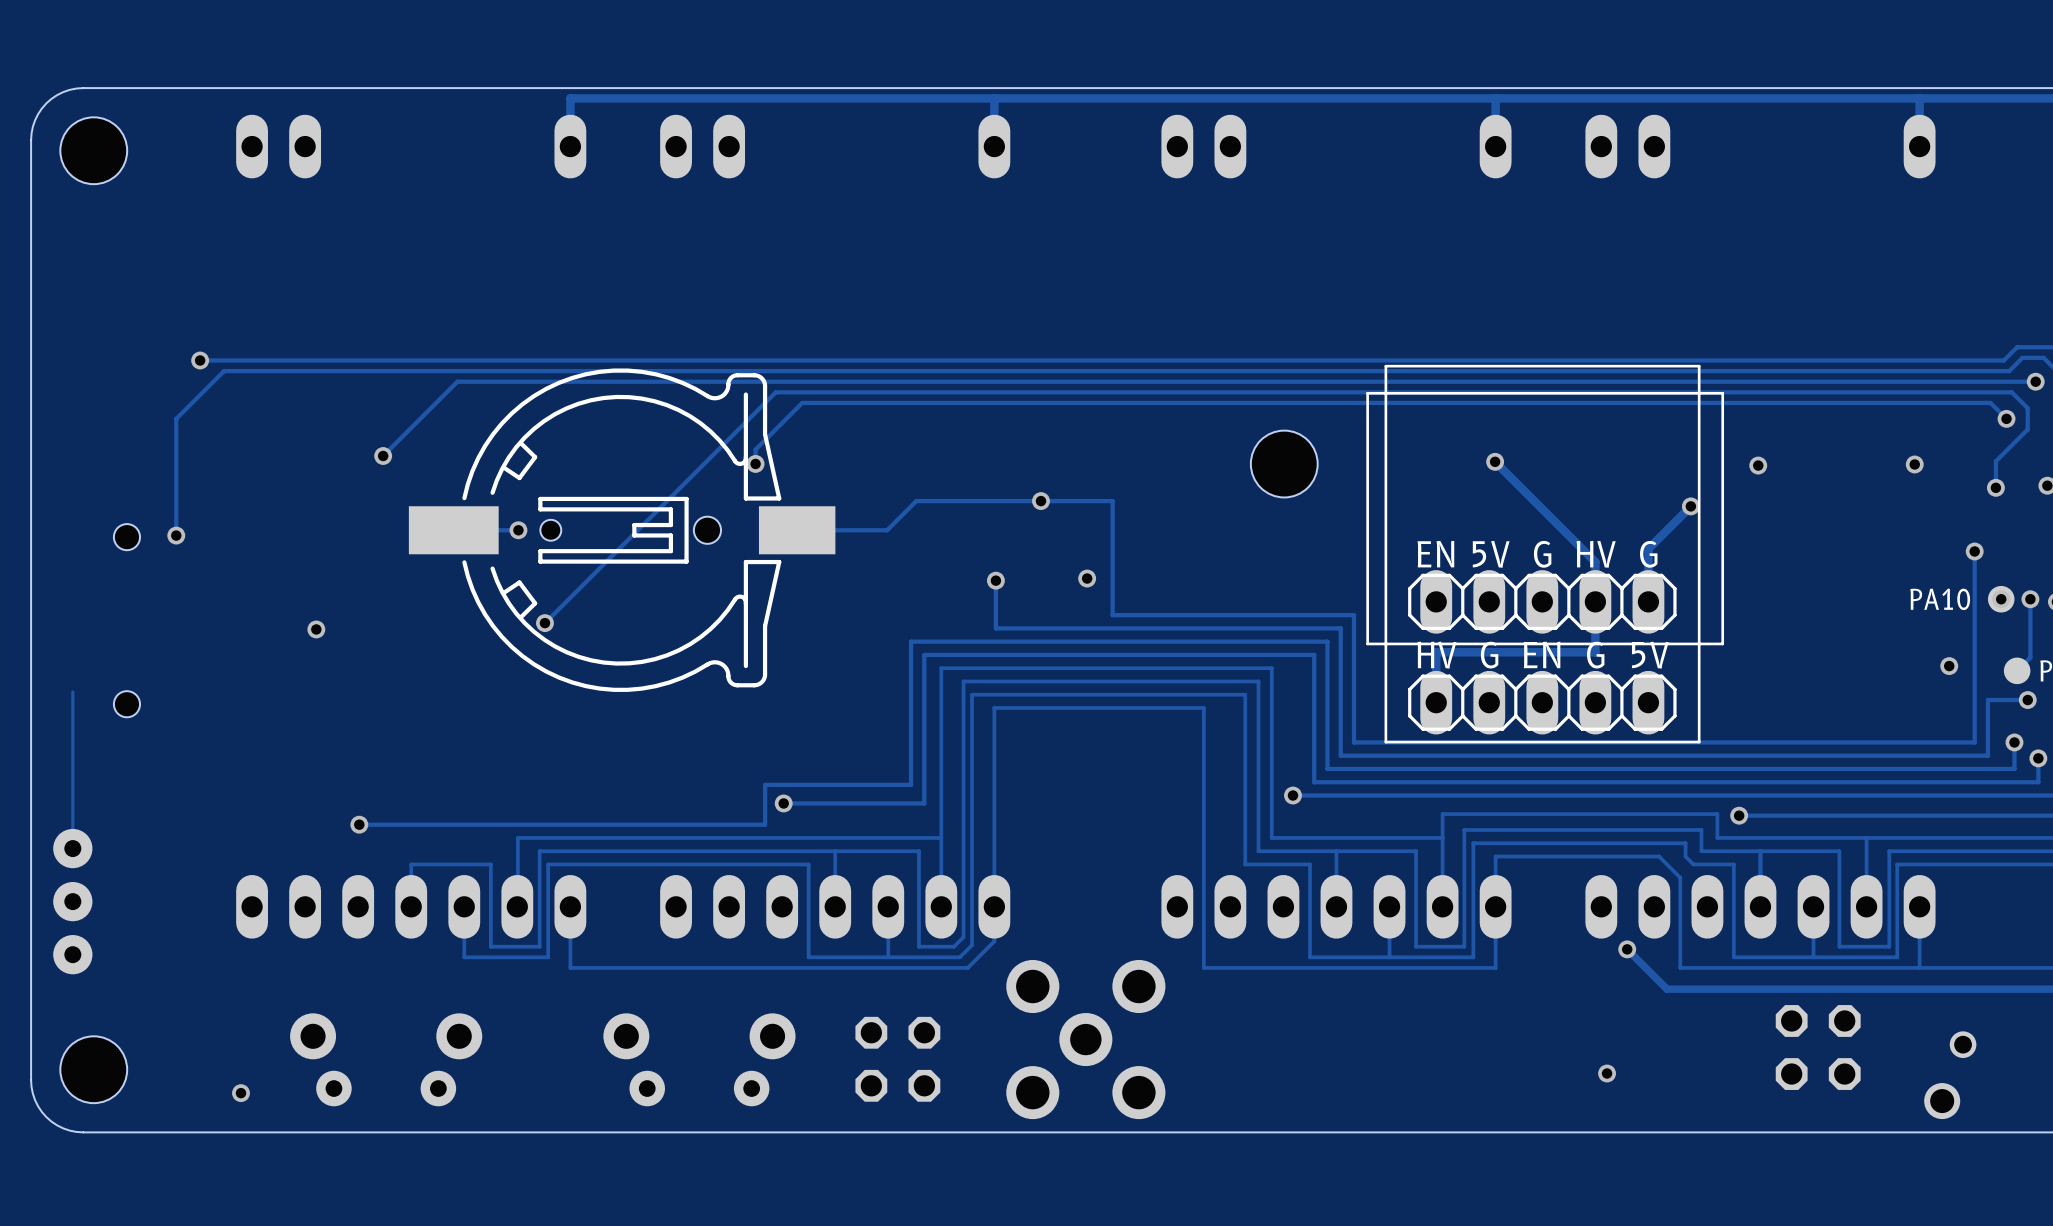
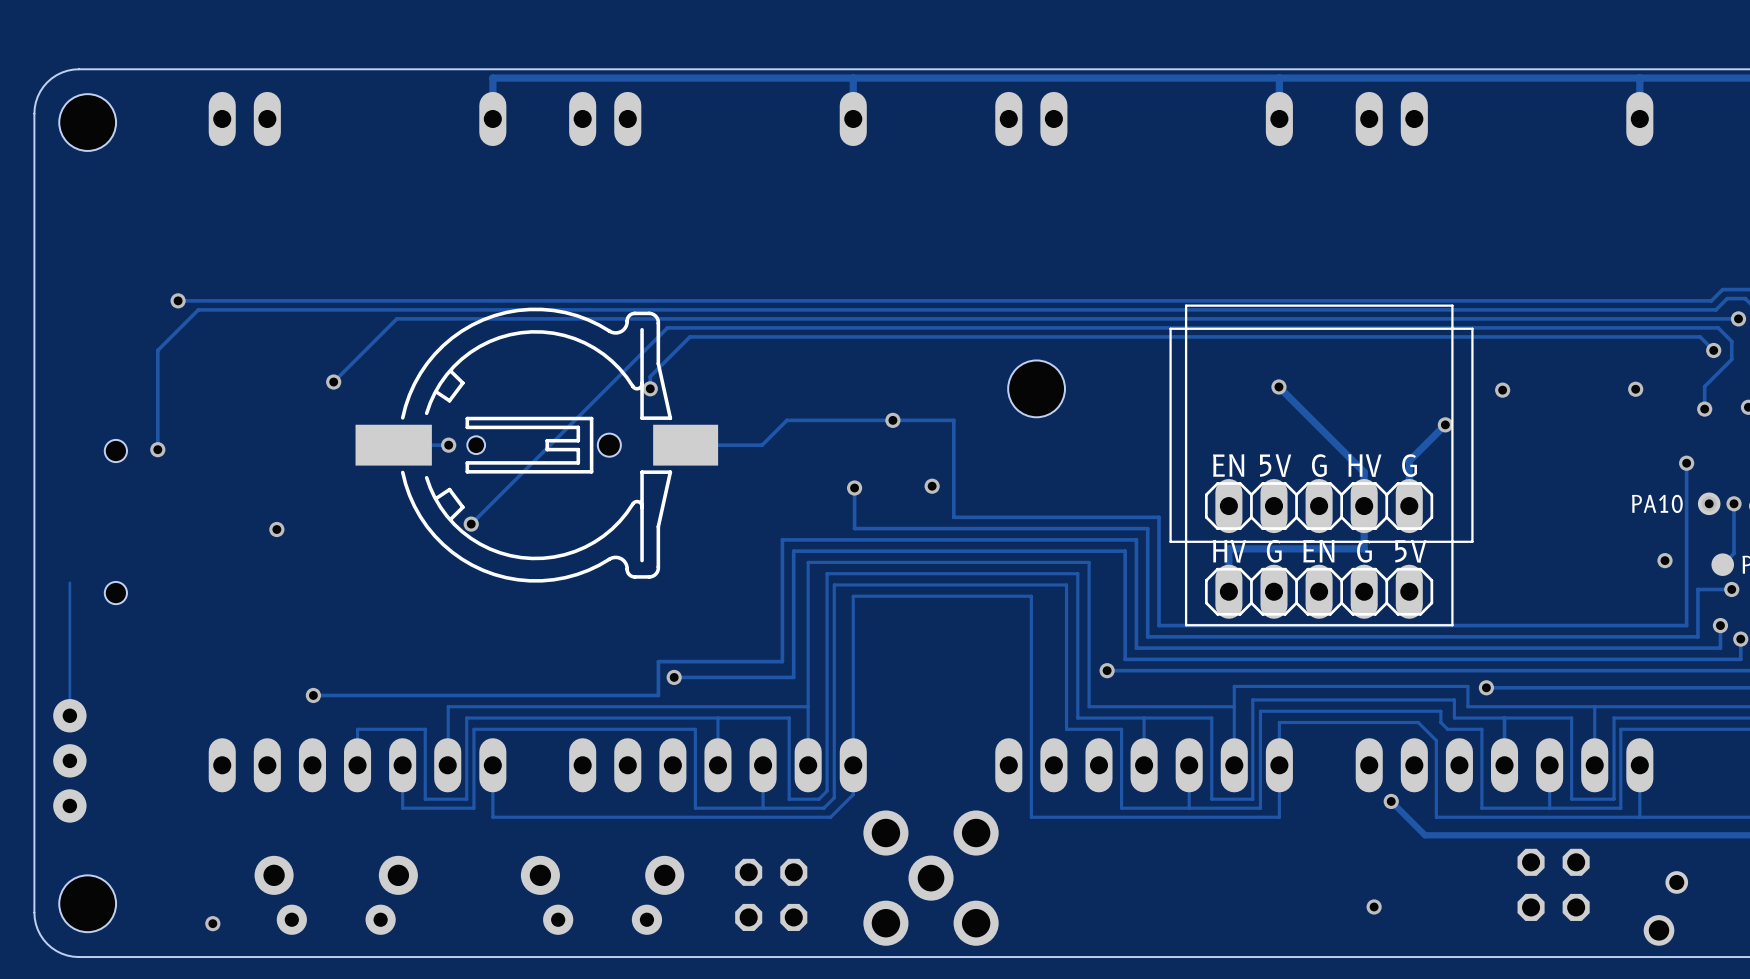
part position: (1284, 464) -> (1036, 388)

